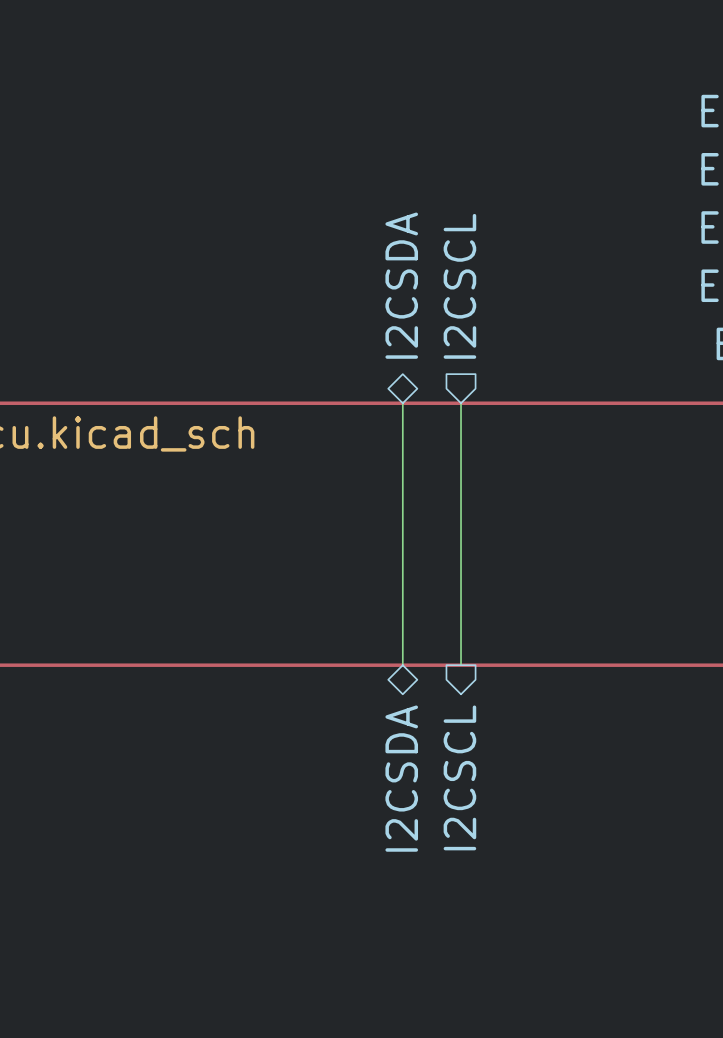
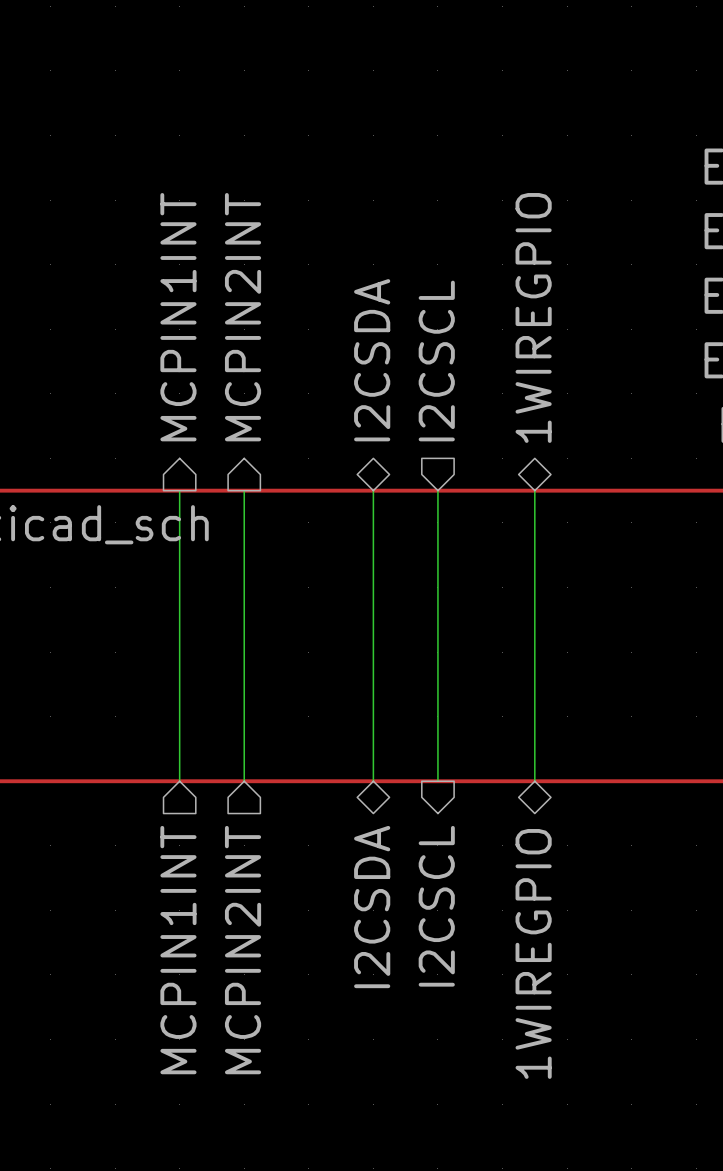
sheet pin: none -> MCPIN1INT (178, 317)
sheet pin: none -> MCPIN2INT (243, 317)
sheet pin: none -> 1WIREGPIO (533, 317)
wire: none -> (179, 490) (179, 781)
wire: none -> (244, 490) (244, 781)
wire: none -> (534, 490) (534, 781)
sheet pin: none -> MCPIN1INT (178, 950)
sheet pin: none -> MCPIN2INT (243, 950)
sheet pin: none -> 1WIREGPIO (533, 953)

